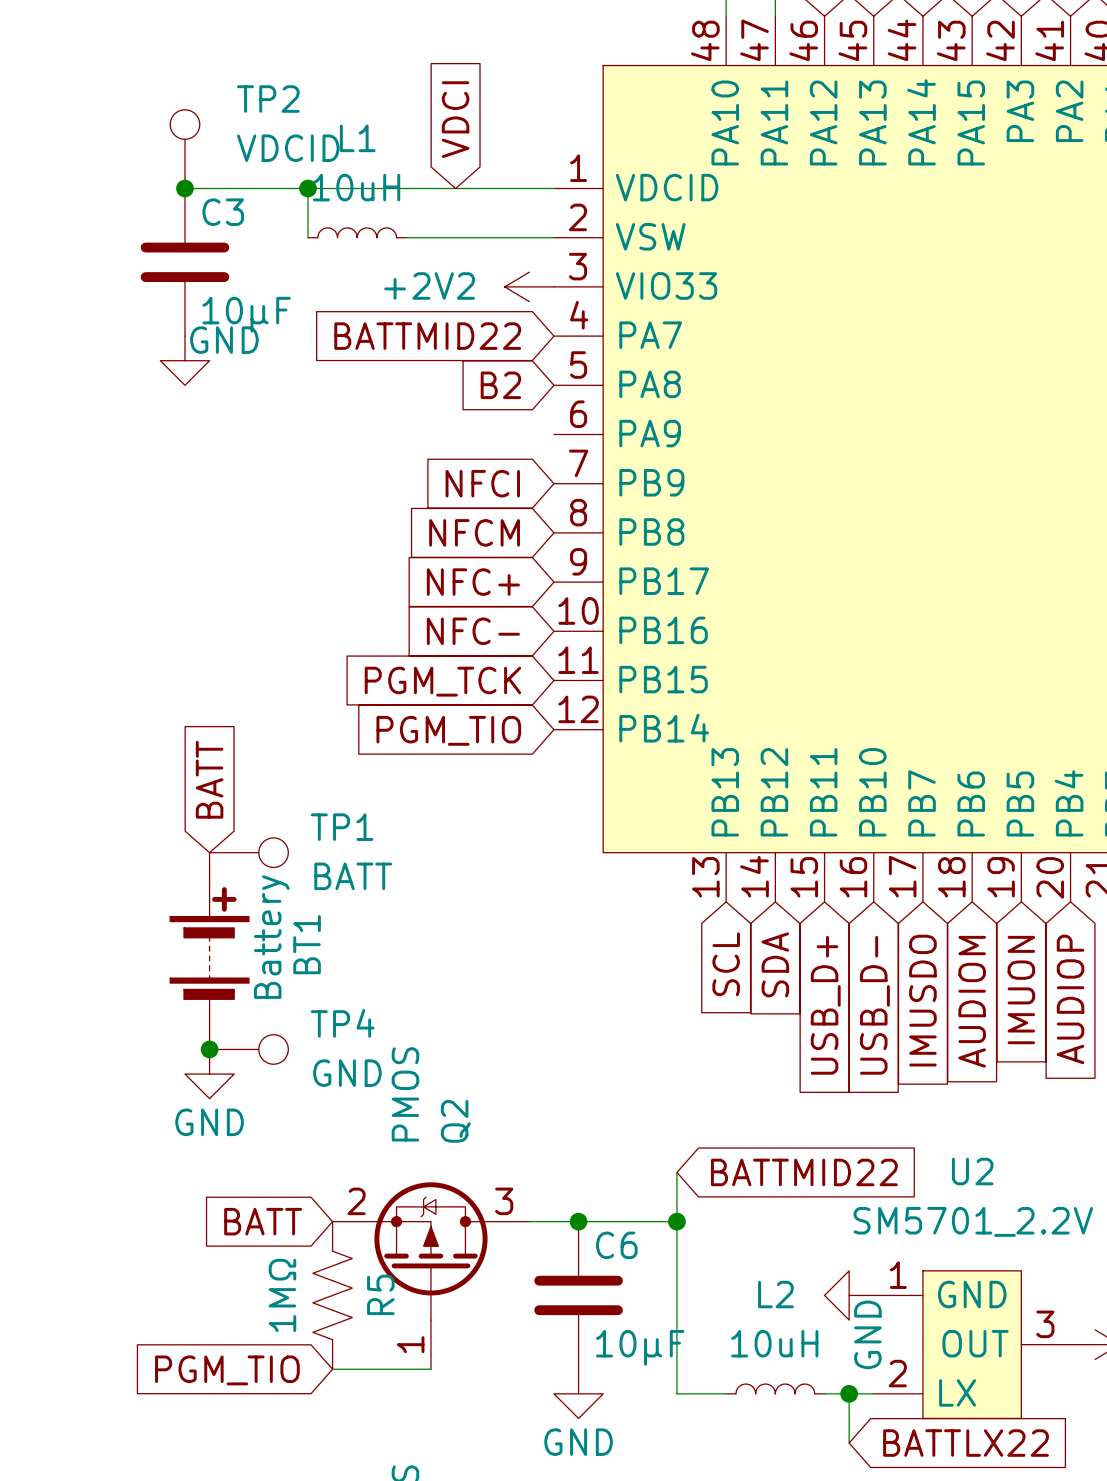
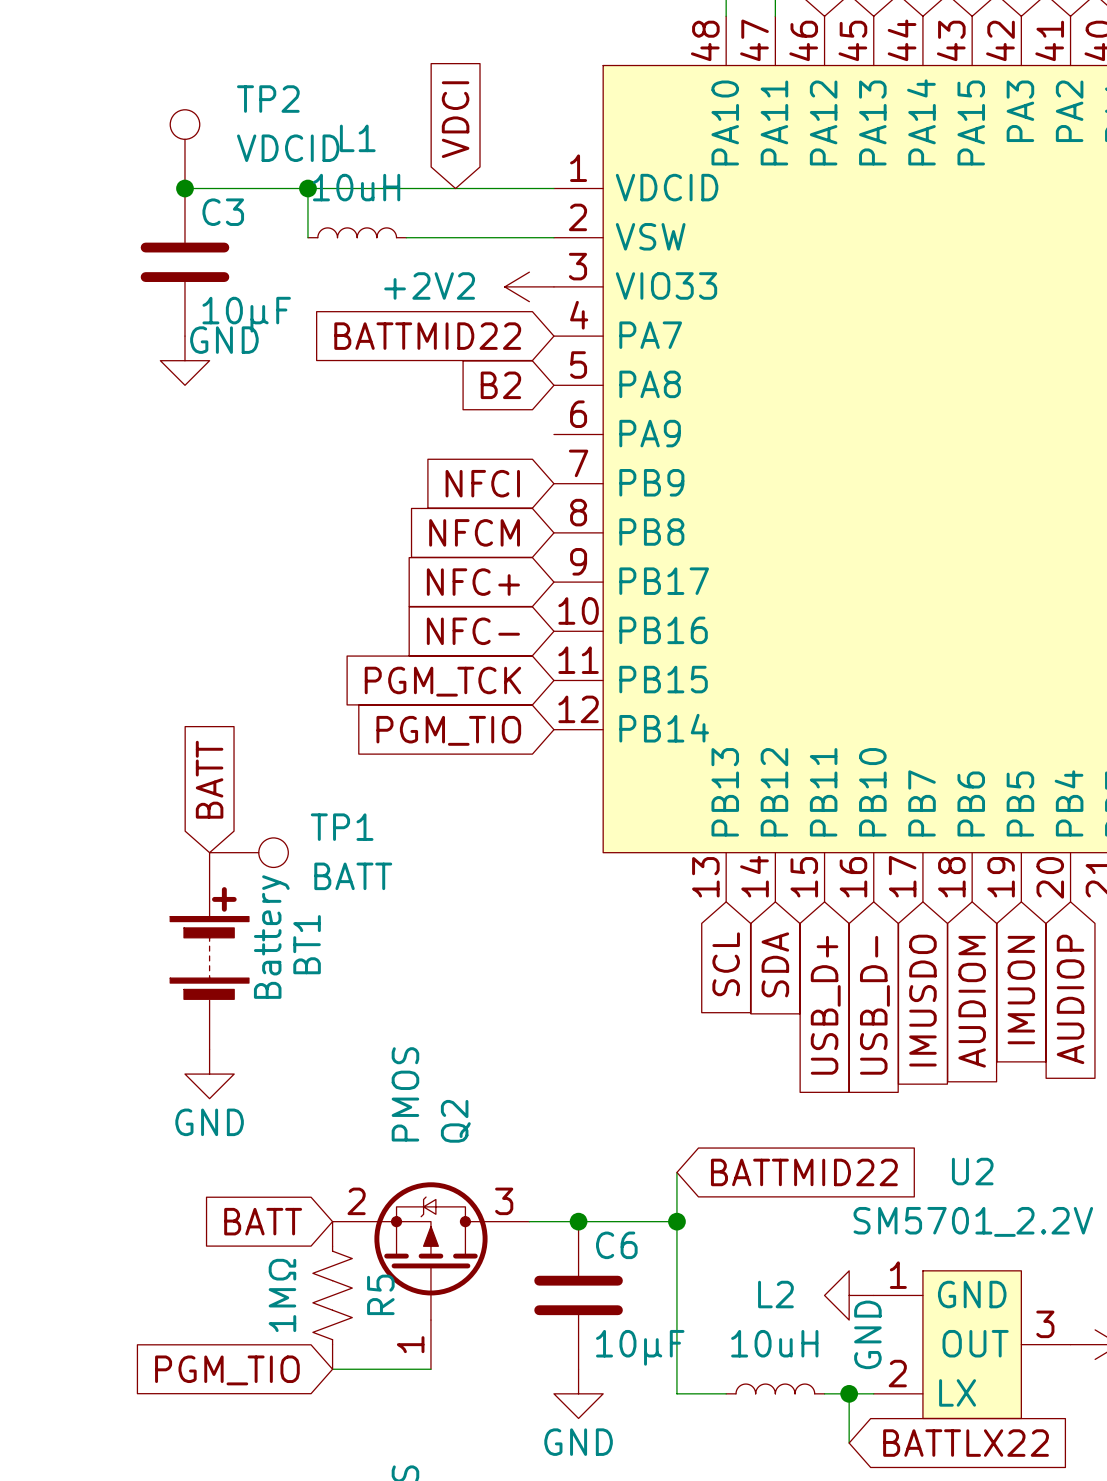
junction: (209, 1049) -> none
TP4: GND (248, 1049) -> none

